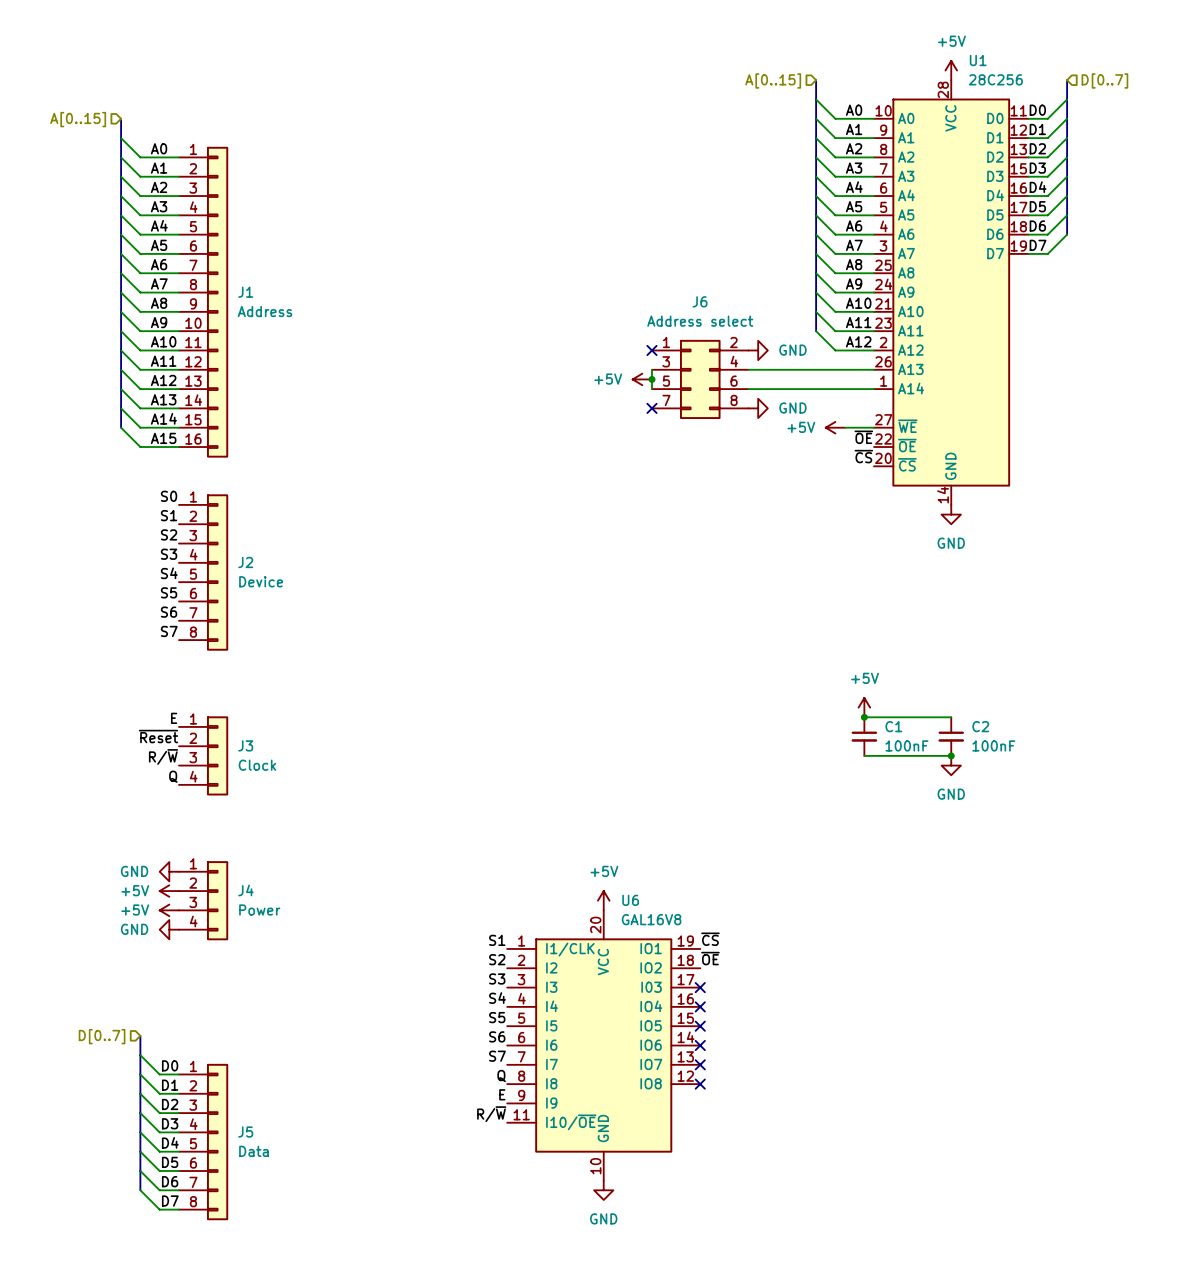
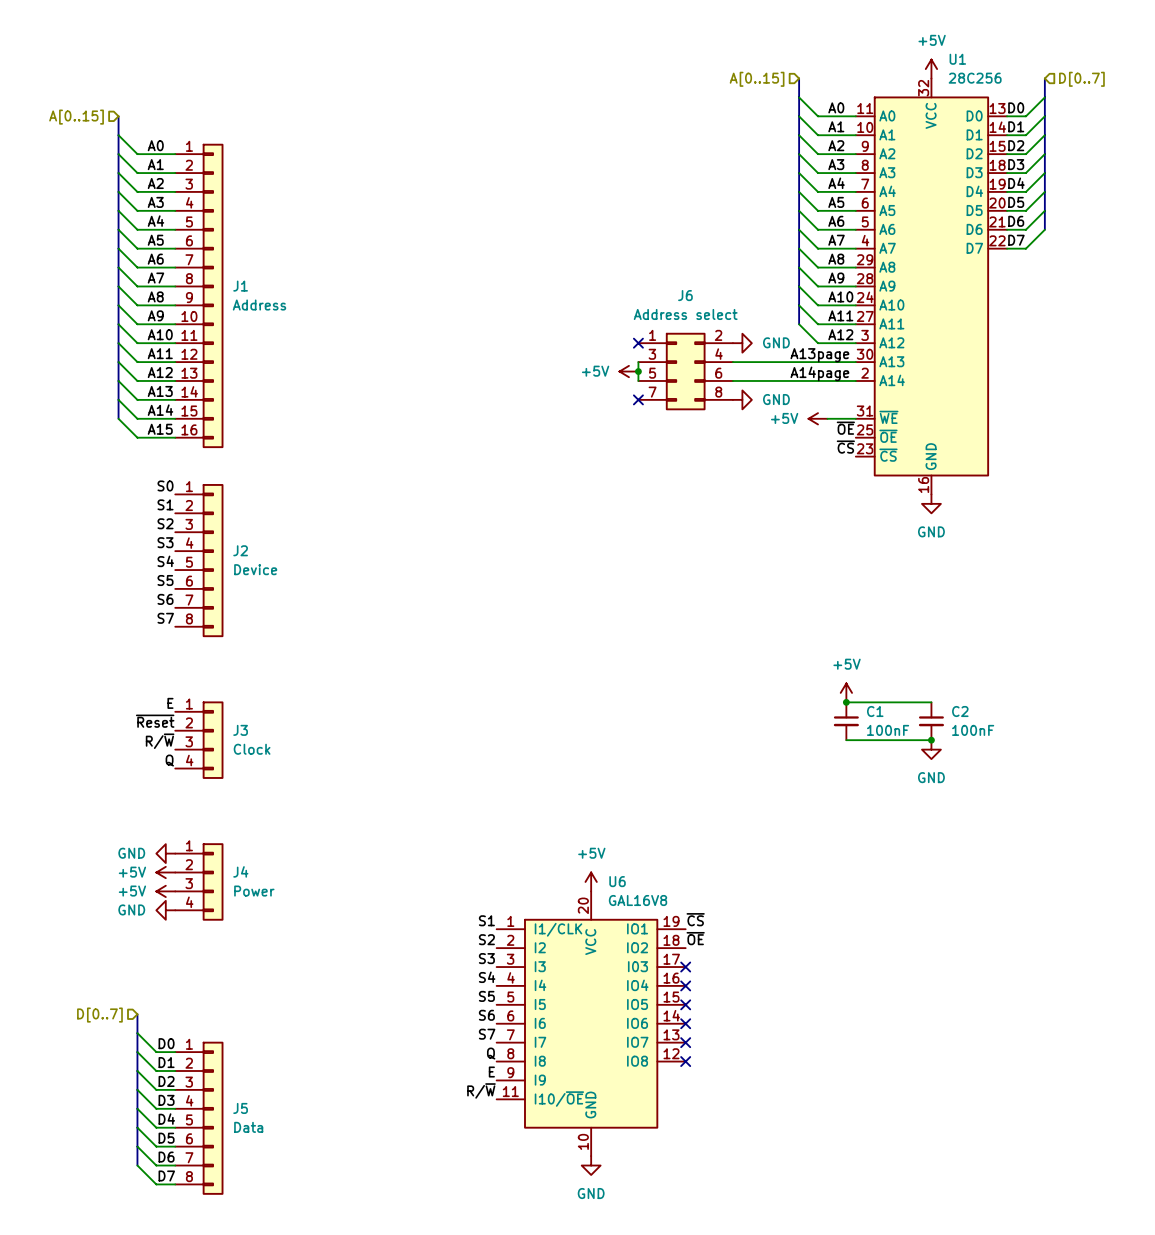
U1 symbol: [874, 80, 1029, 505] -> [855, 78, 1008, 495]
label: none -> A13page (819, 355)
label: none -> A14page (819, 373)

